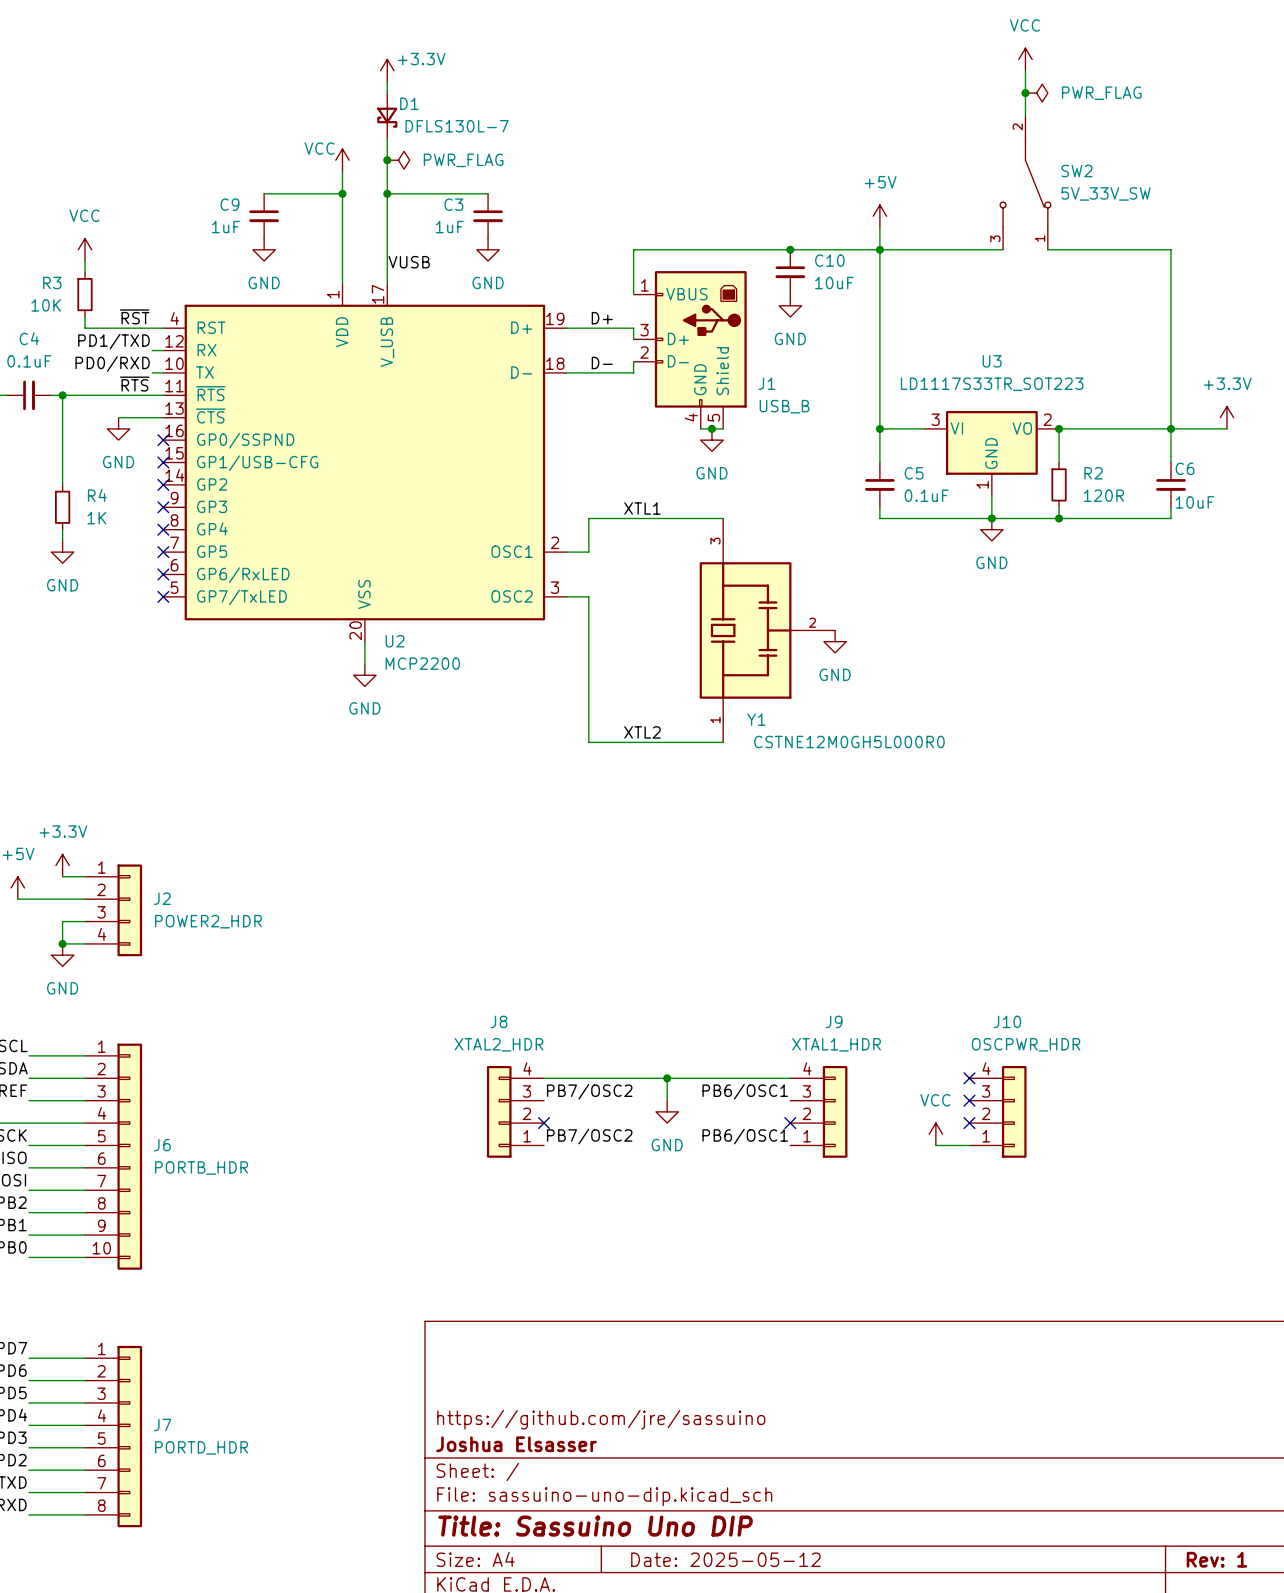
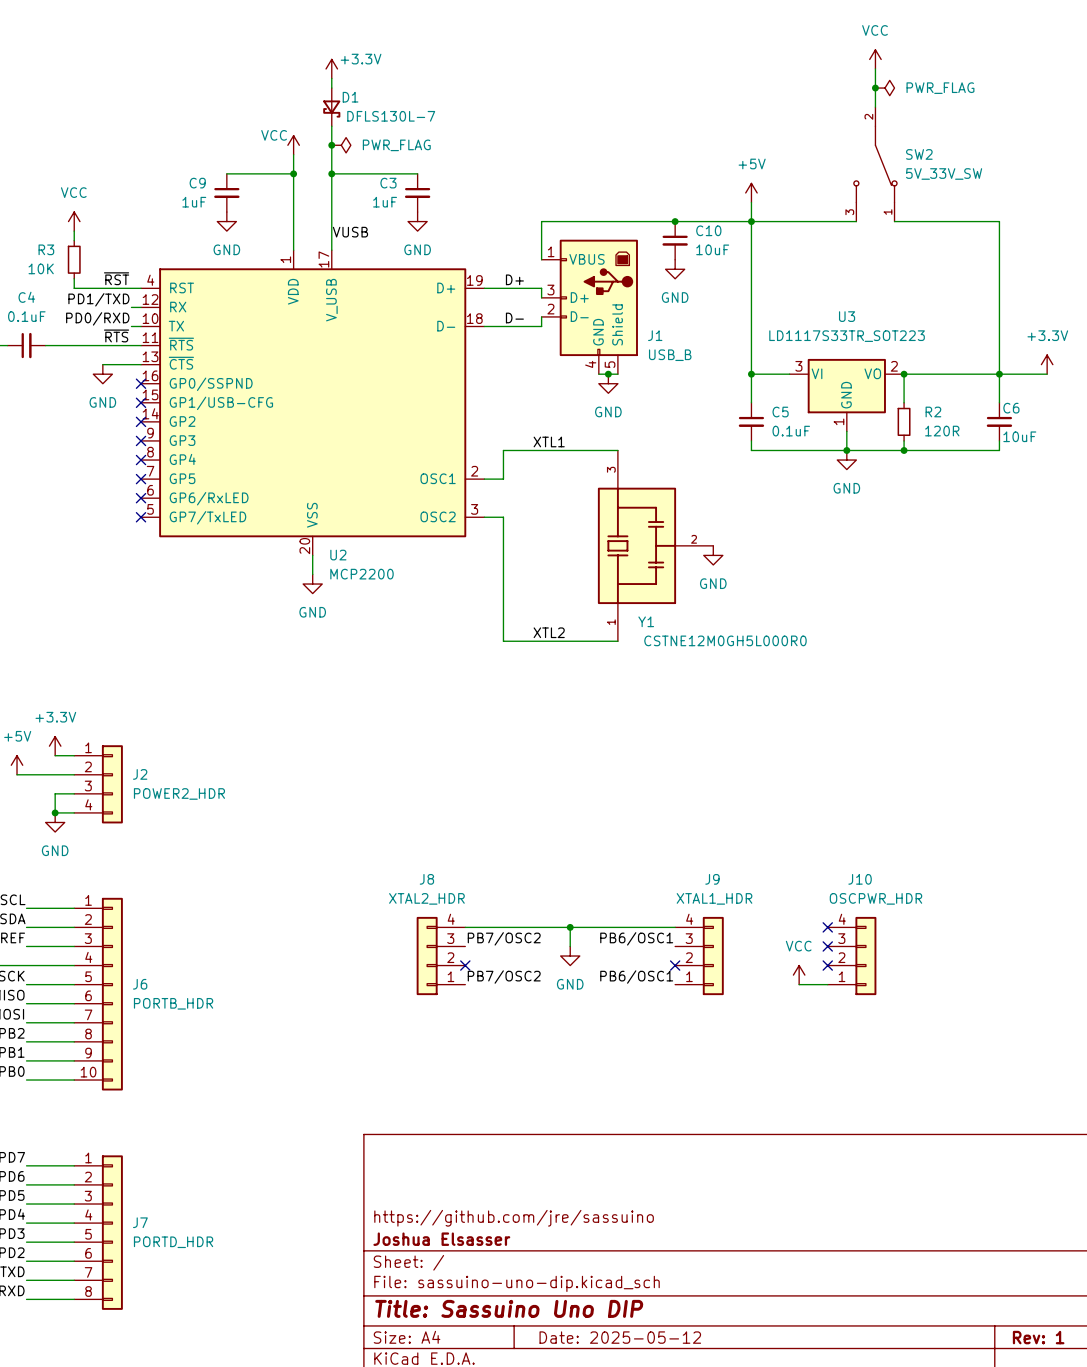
wire: (62, 395) (62, 484) -> none
junction: (62, 395) -> none
R4: 1K (62, 507) -> none
wire: (62, 529) (62, 540) -> none
power symbol: GND (62, 552) -> none

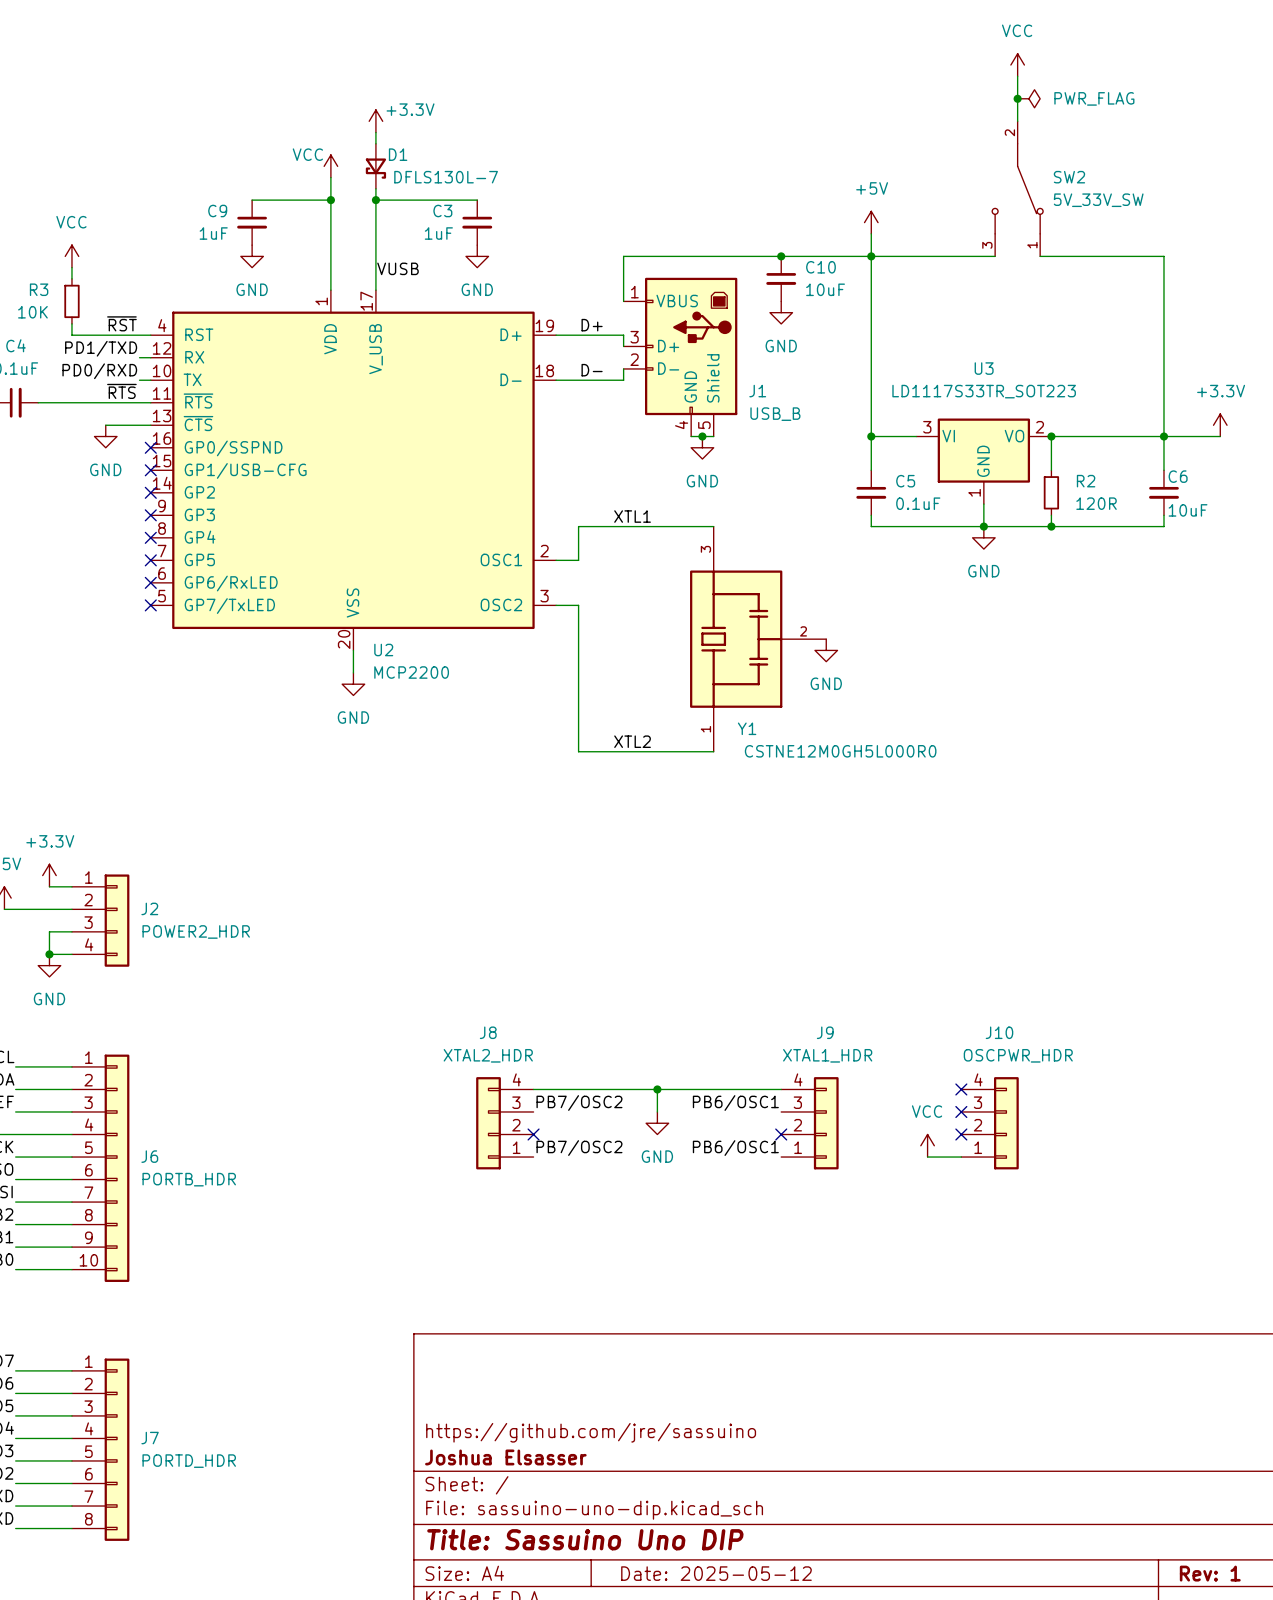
power symbol position: +3.3V (331, 68) -> +3.3V (375, 121)
wire: (331, 78) (331, 88) -> none
D1 position: (331, 107) -> (375, 166)
junction: (331, 145) -> none
power symbol: PWR_FLAG (341, 145) -> none

